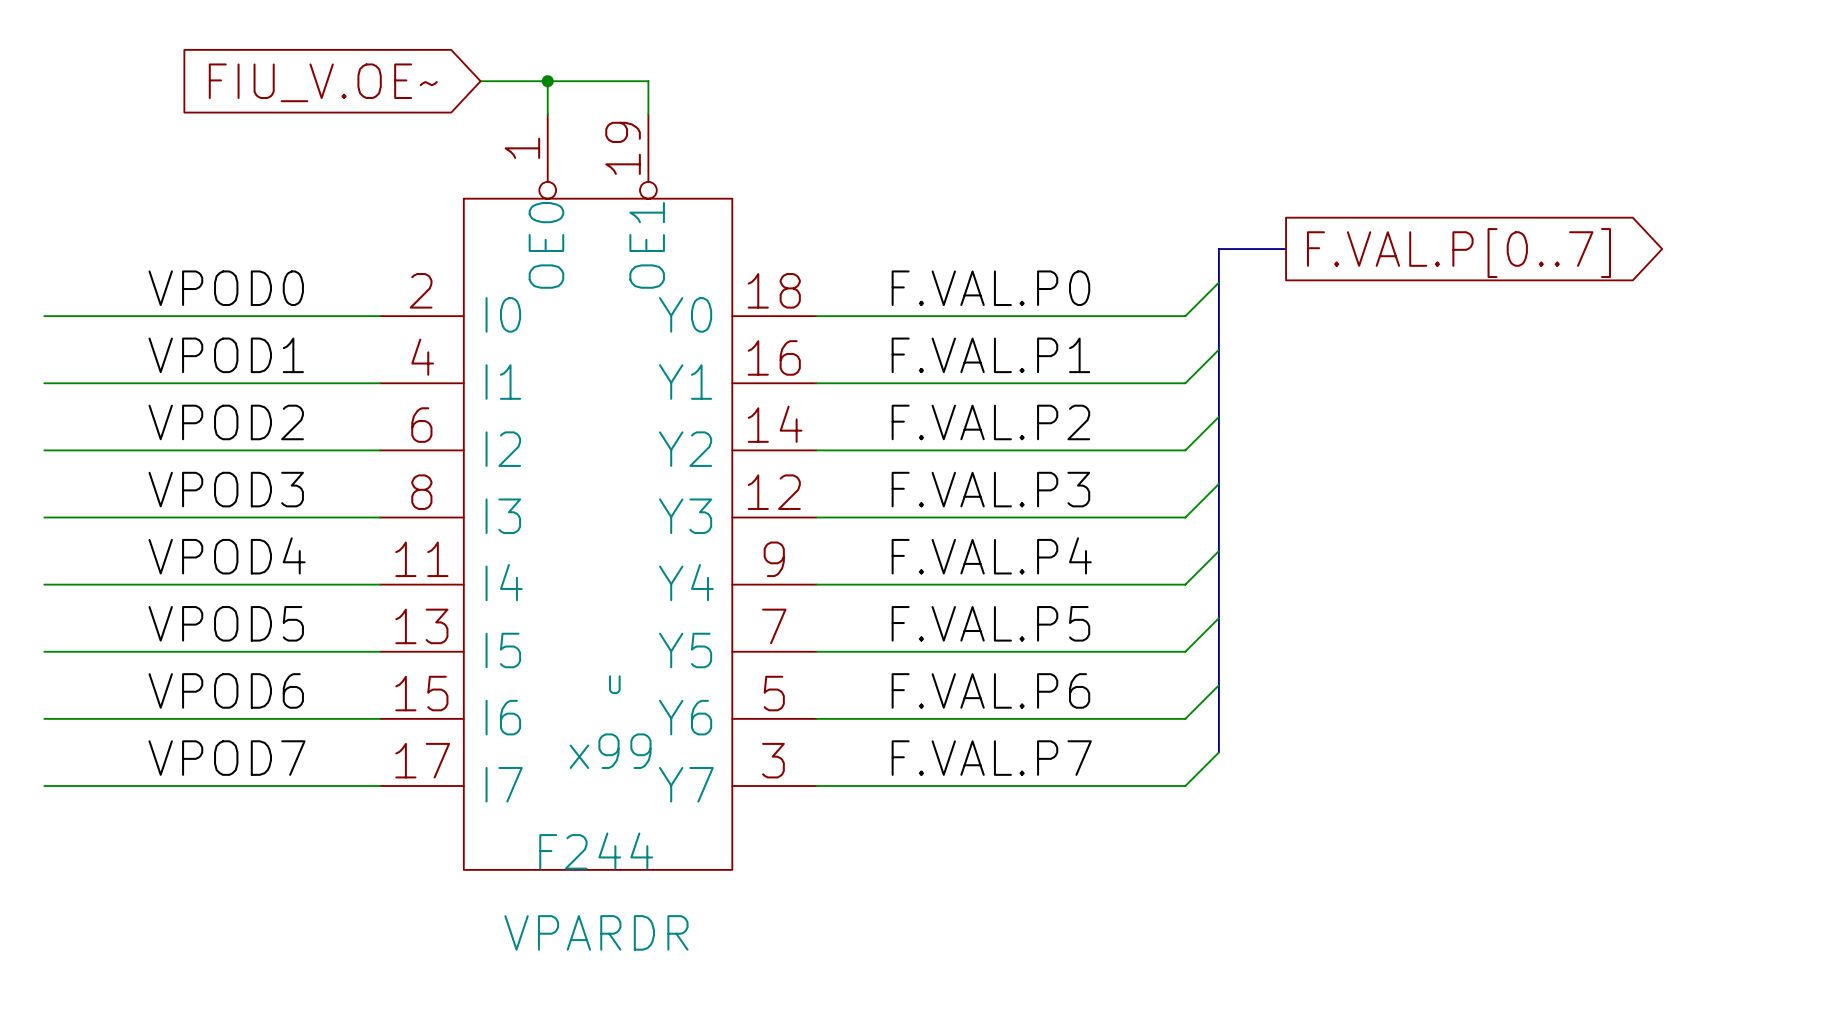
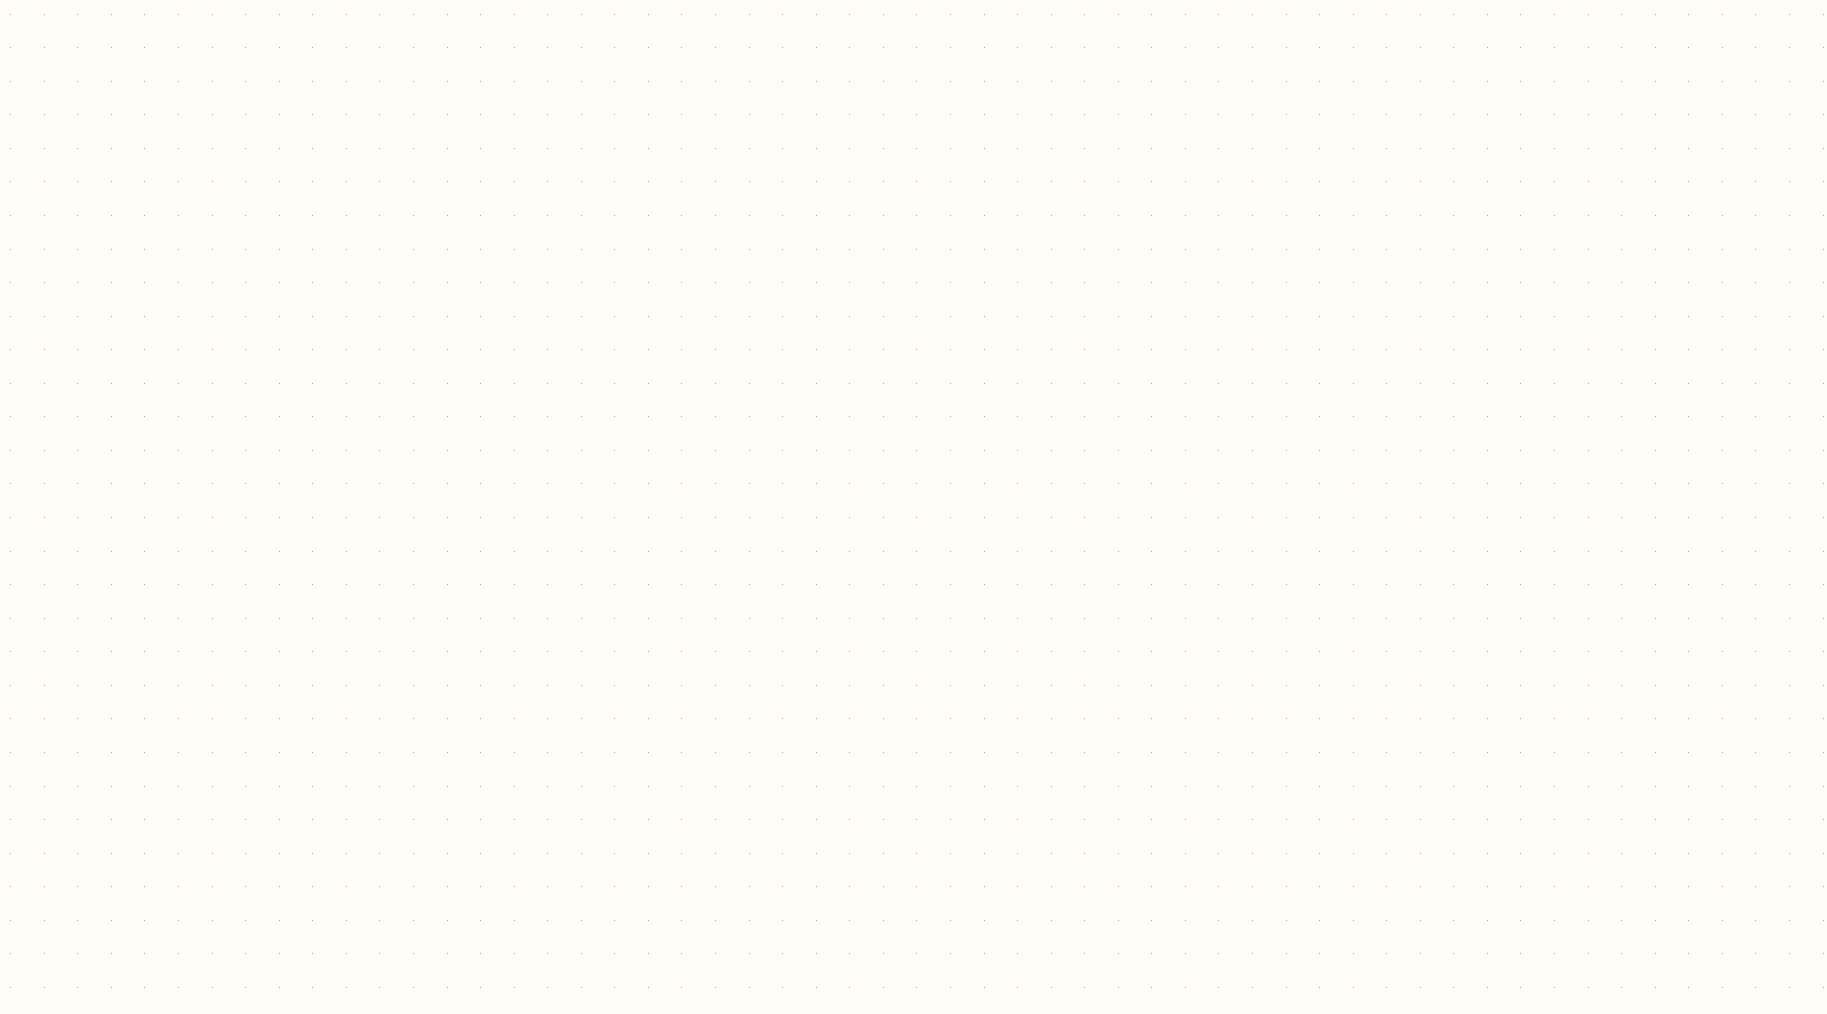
wire: (480, 81) (648, 81) (648, 114) -> none
wire: (547, 81) (547, 114) -> none
junction: (547, 81) -> none
global label: FIU_V.OE~ (323, 82) -> none
bus: (1286, 249) (1218, 249) (1218, 752) -> none
global label: F.VAL.P[0..7] (1458, 253) -> none
wire: (1218, 282) (1185, 316) (816, 316) -> none
label: VPOD0 (226, 288) -> none
label: F.VAL.P0 (990, 288) -> none
wire: (44, 316) (379, 316) -> none
wire: (1218, 349) (1185, 383) (816, 383) -> none
label: VPOD1 (226, 355) -> none
label: F.VAL.P1 (990, 355) -> none
wire: (44, 383) (379, 383) -> none
wire: (1218, 416) (1185, 450) (816, 450) -> none
label: VPOD2 (226, 422) -> none
label: F.VAL.P2 (990, 422) -> none
wire: (44, 450) (379, 450) -> none
wire: (1218, 483) (1185, 517) (816, 517) -> none
label: VPOD3 (226, 489) -> none
label: F.VAL.P3 (990, 489) -> none
U: F244 (598, 492) -> none
wire: (44, 517) (379, 517) -> none
wire: (1218, 551) (1185, 584) (816, 584) -> none
label: VPOD4 (227, 555) -> none
label: F.VAL.P4 (991, 555) -> none
wire: (44, 584) (379, 584) -> none
wire: (1218, 618) (1185, 651) (816, 651) -> none
label: VPOD5 (226, 623) -> none
label: F.VAL.P5 (990, 623) -> none
wire: (44, 651) (379, 651) -> none
wire: (1218, 685) (1185, 718) (816, 718) -> none
label: VPOD6 (226, 690) -> none
label: F.VAL.P6 (990, 690) -> none
wire: (44, 718) (379, 718) -> none
wire: (1218, 752) (1185, 786) (816, 786) -> none
label: VPOD7 (227, 758) -> none
label: F.VAL.P7 (991, 758) -> none
wire: (44, 786) (379, 786) -> none

